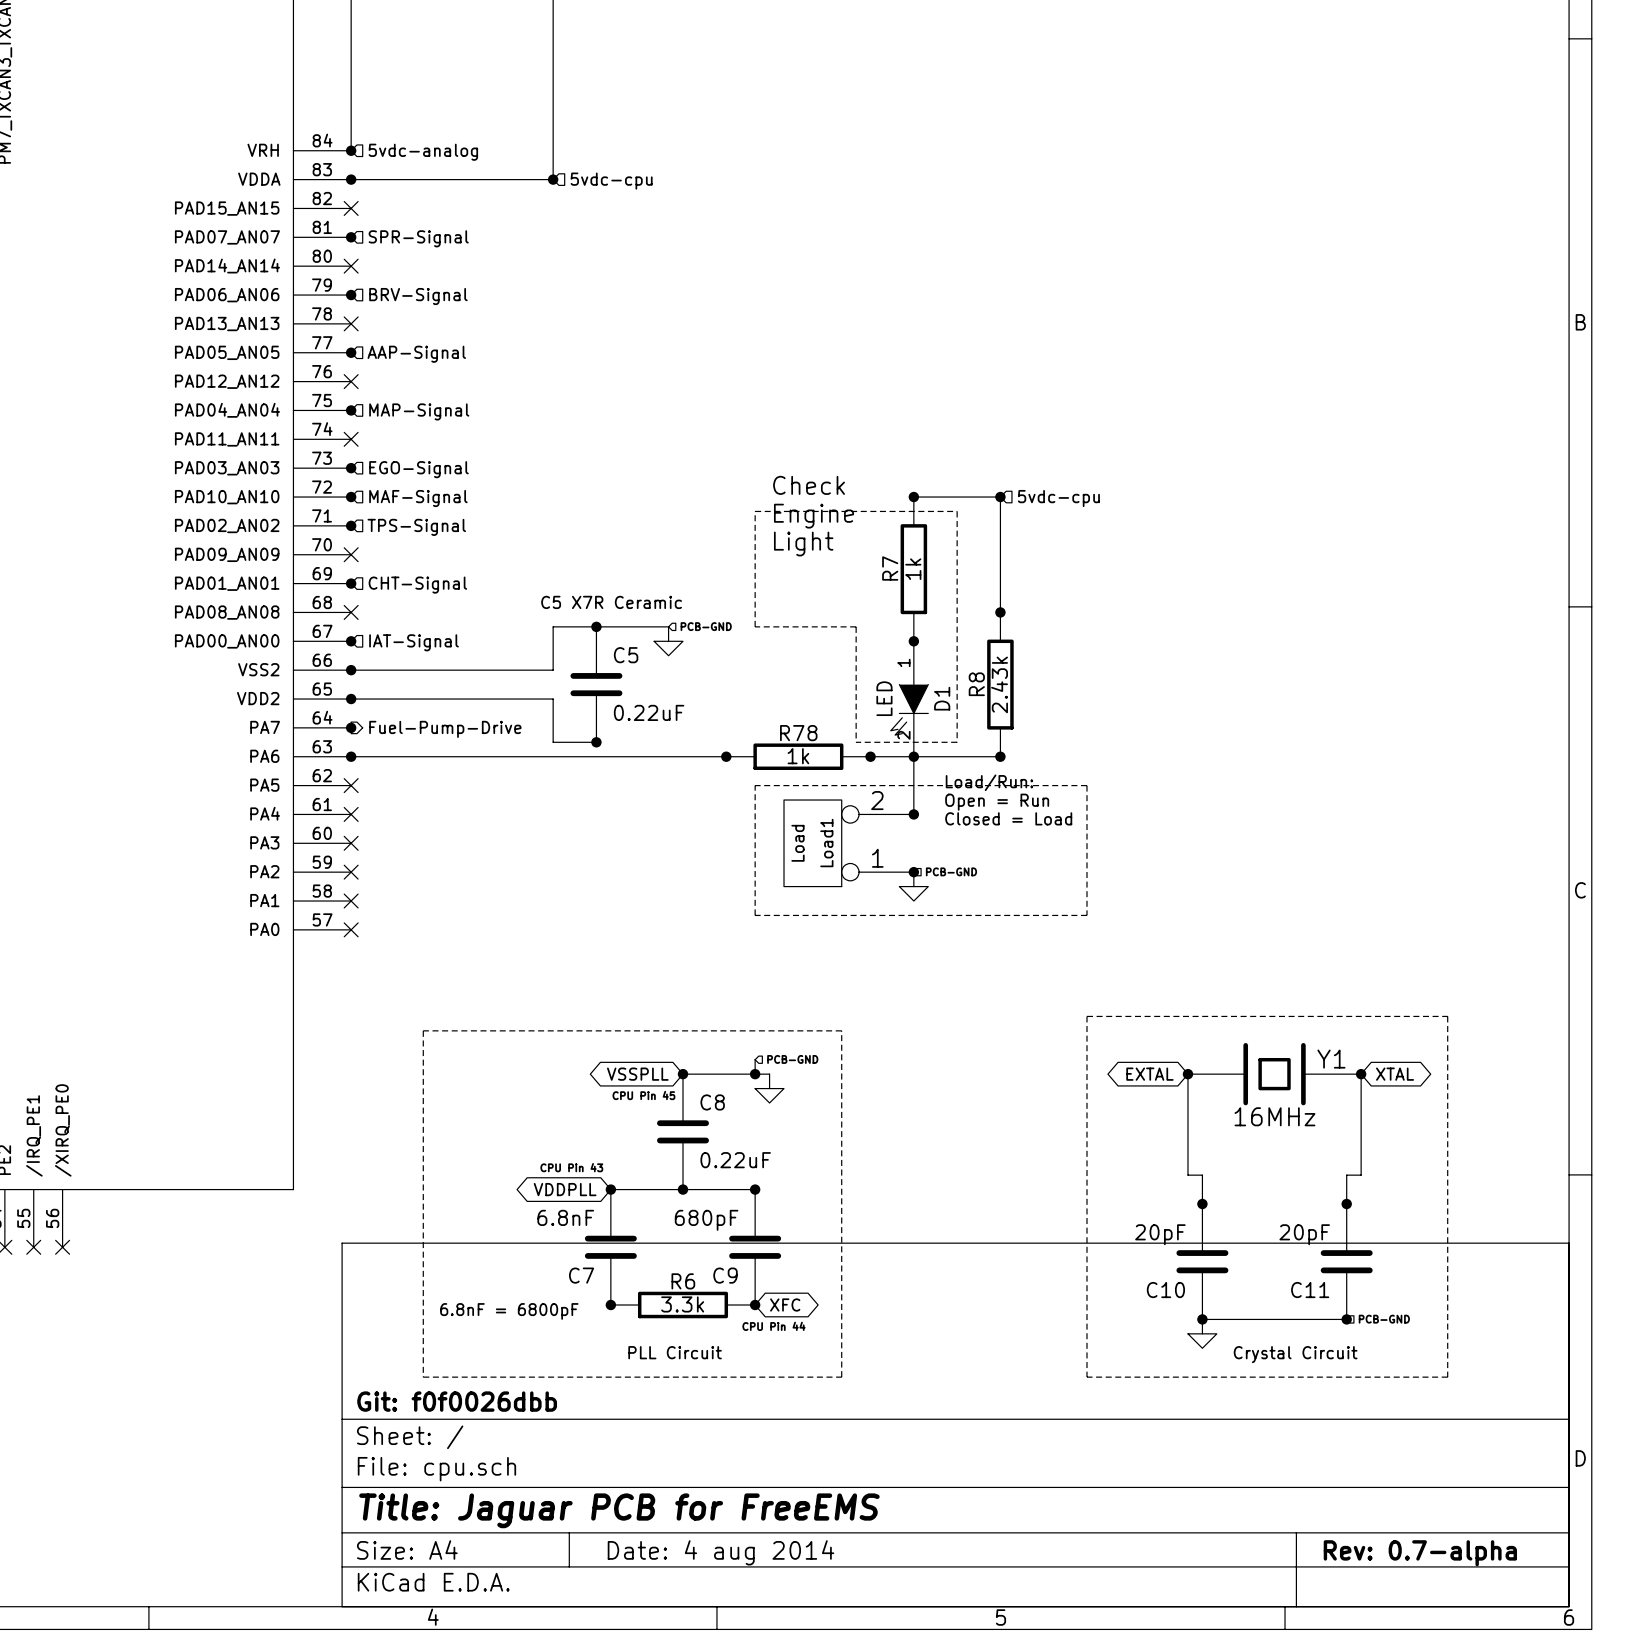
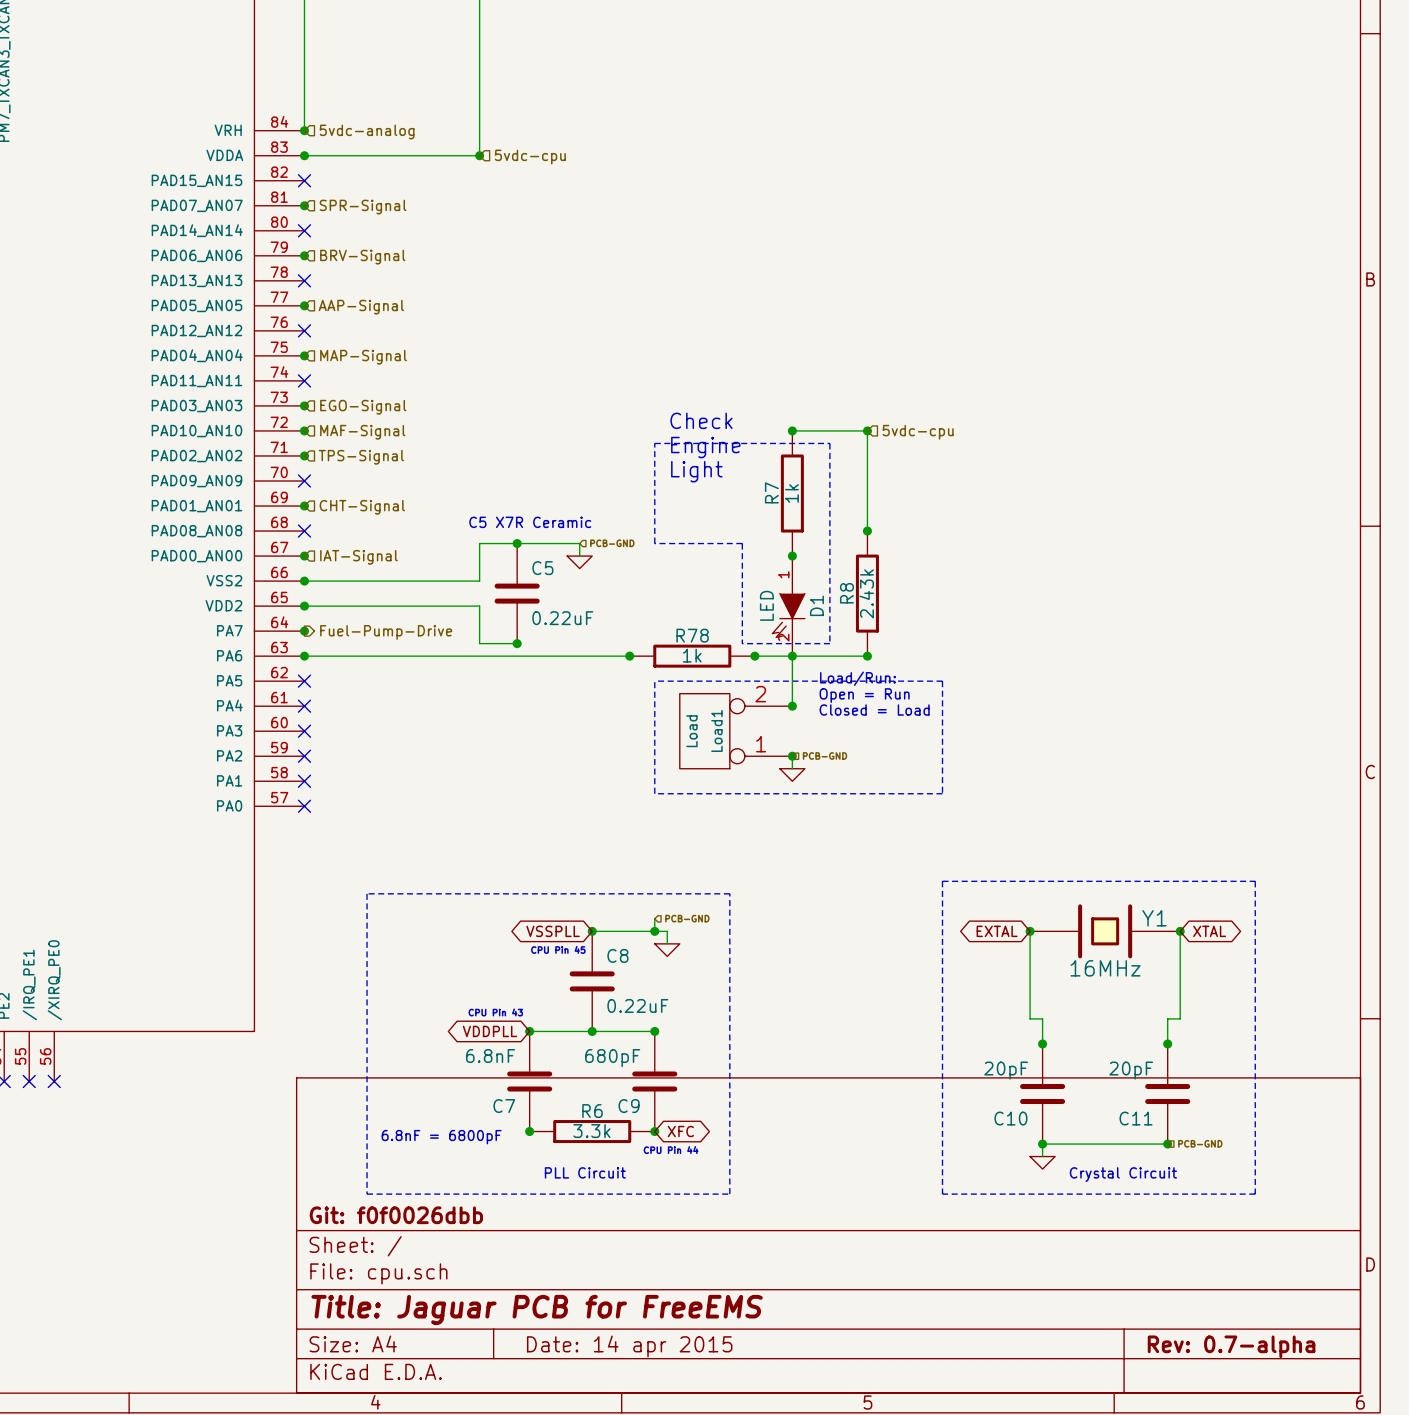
title block: Date: 4 aug 2014 (720, 1552) -> Date: 14 apr 2015 (629, 1346)

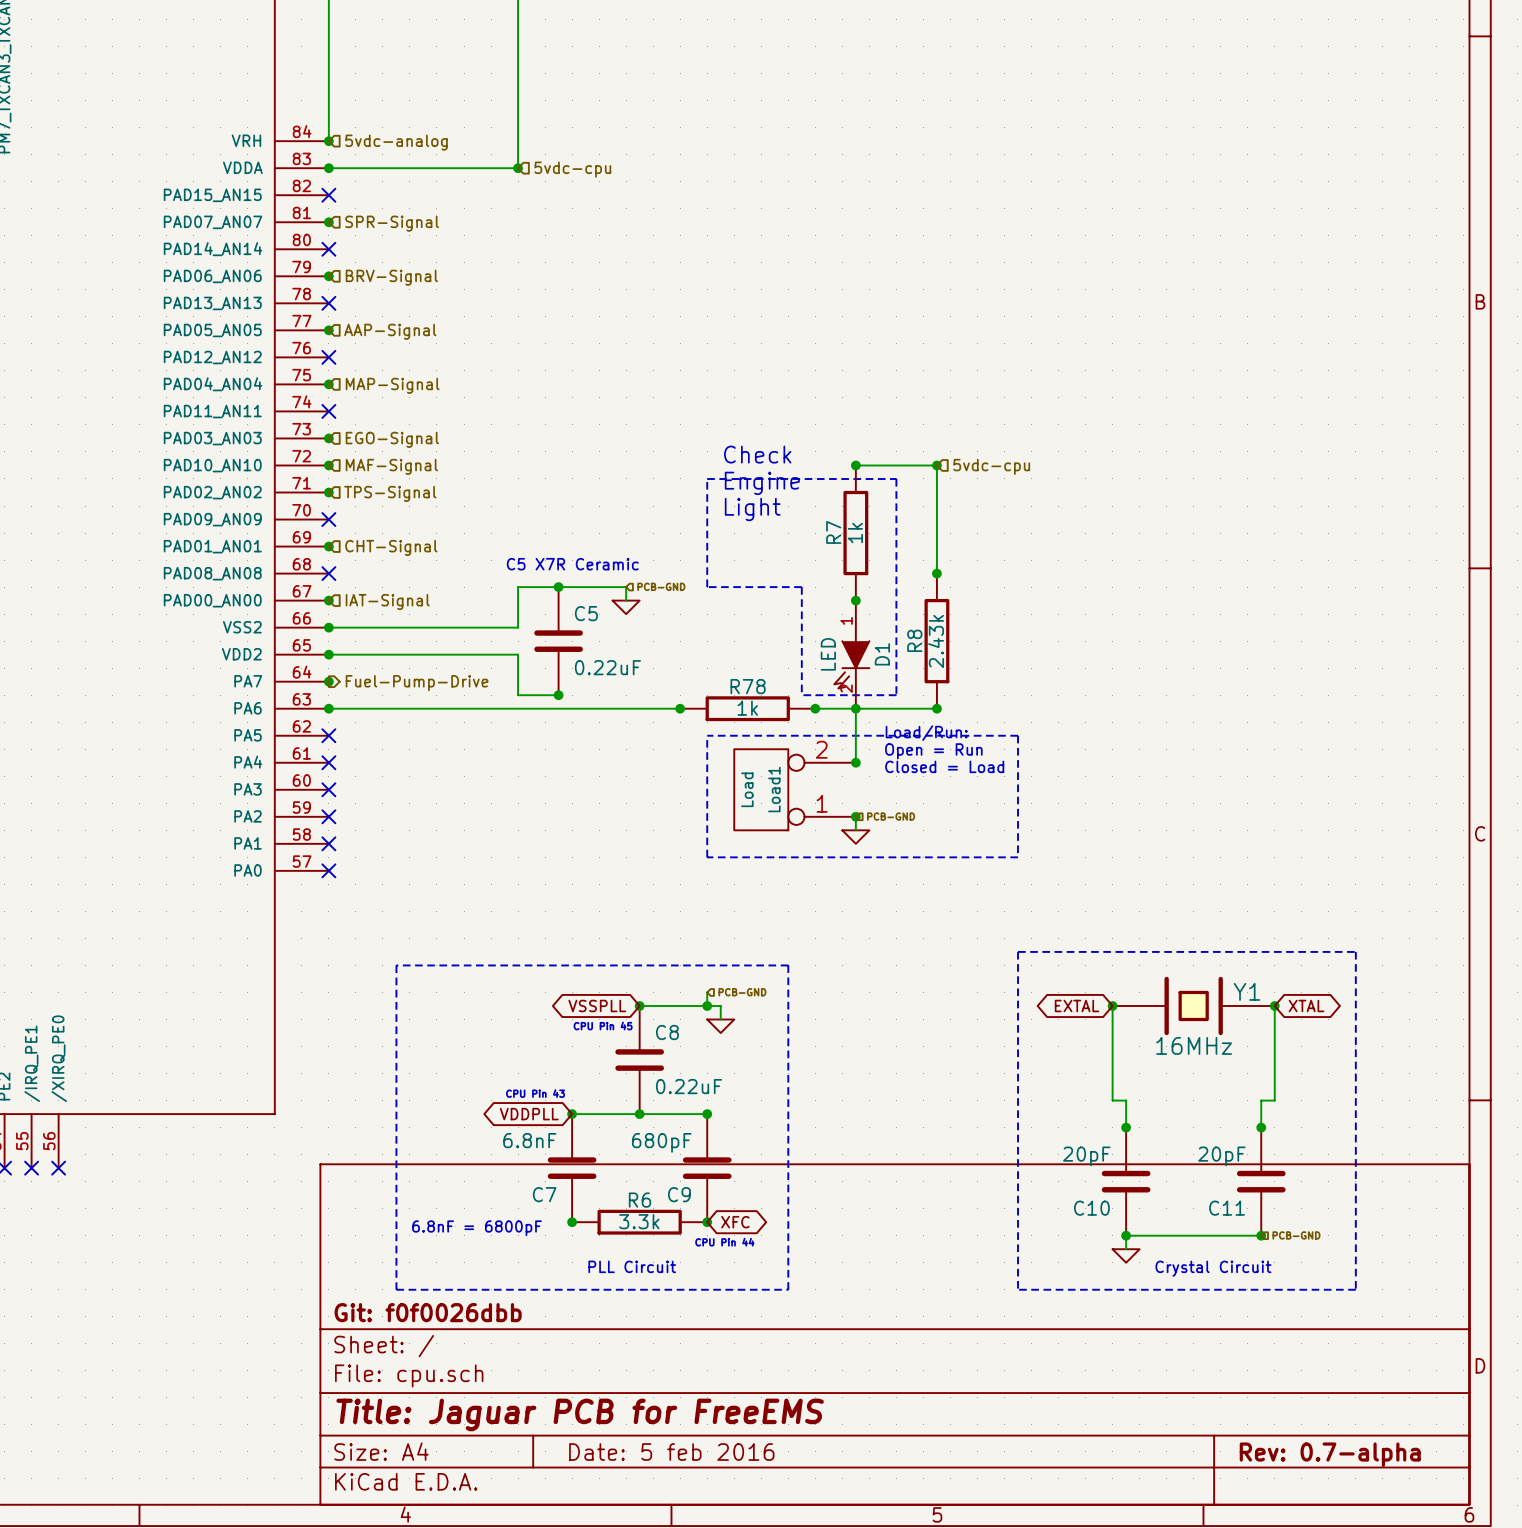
title block: Date: 14 apr 2015 (629, 1346) -> Date: 5 feb 2016 (671, 1452)

